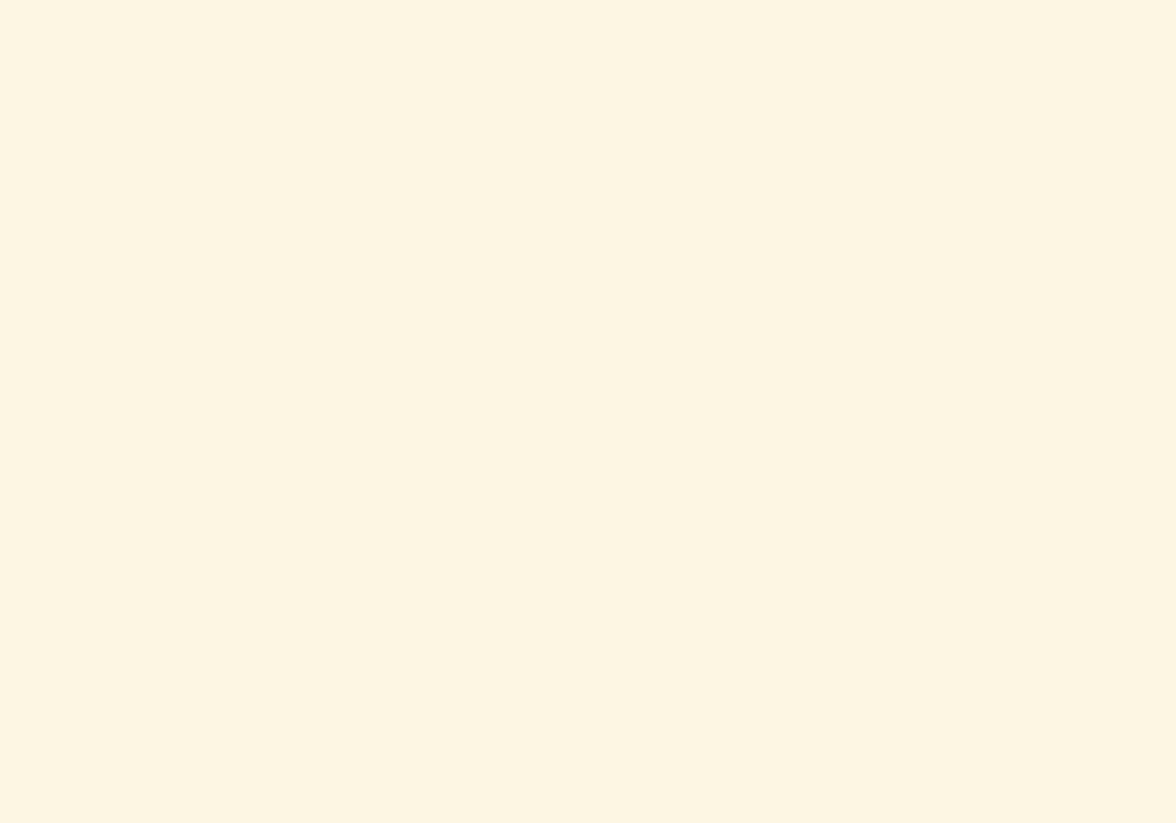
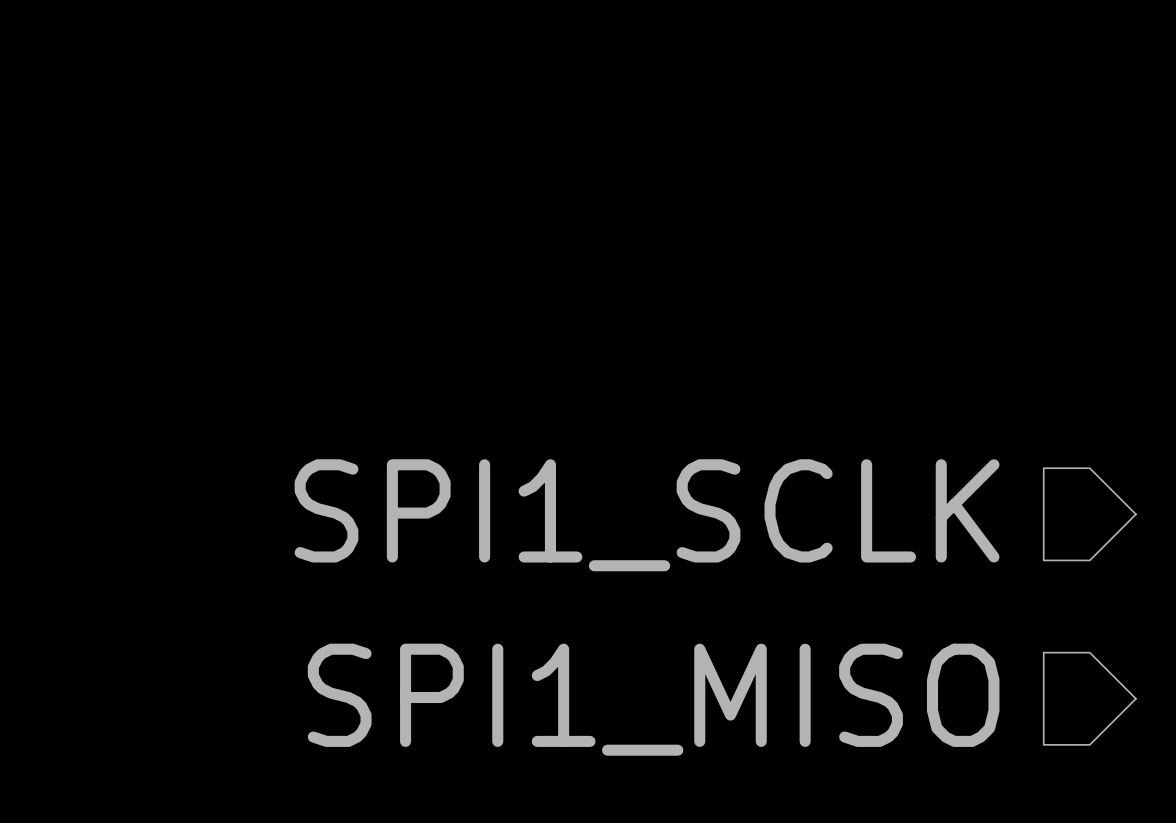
hierarchical label: none -> SPI1_SCLK (647, 515)
hierarchical label: none -> SPI1_MISO (653, 699)

